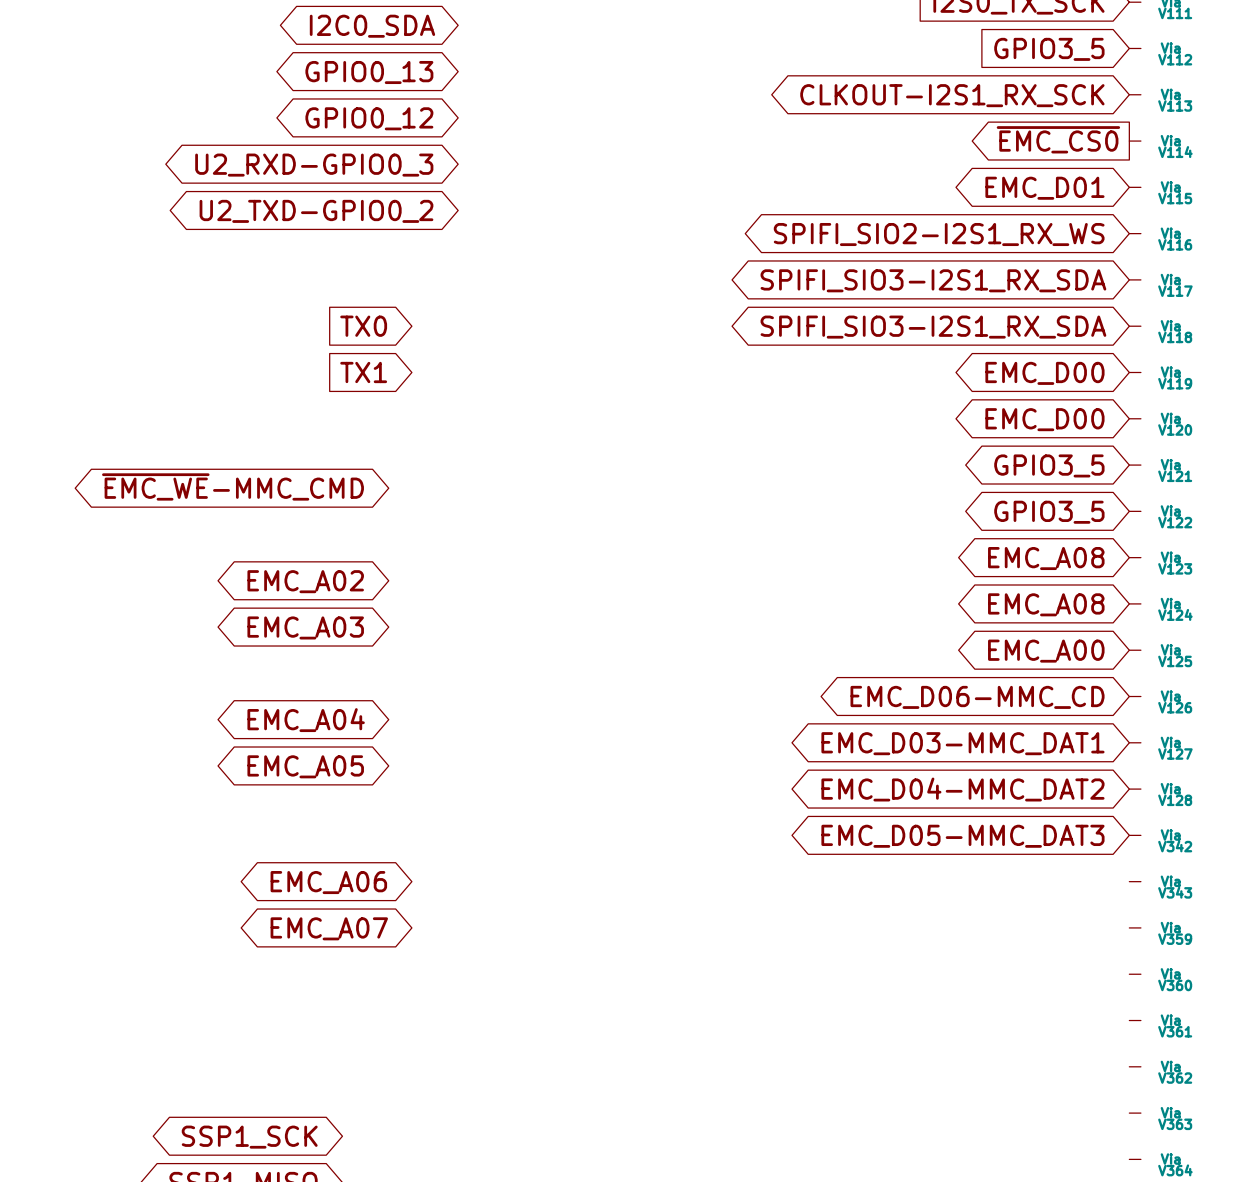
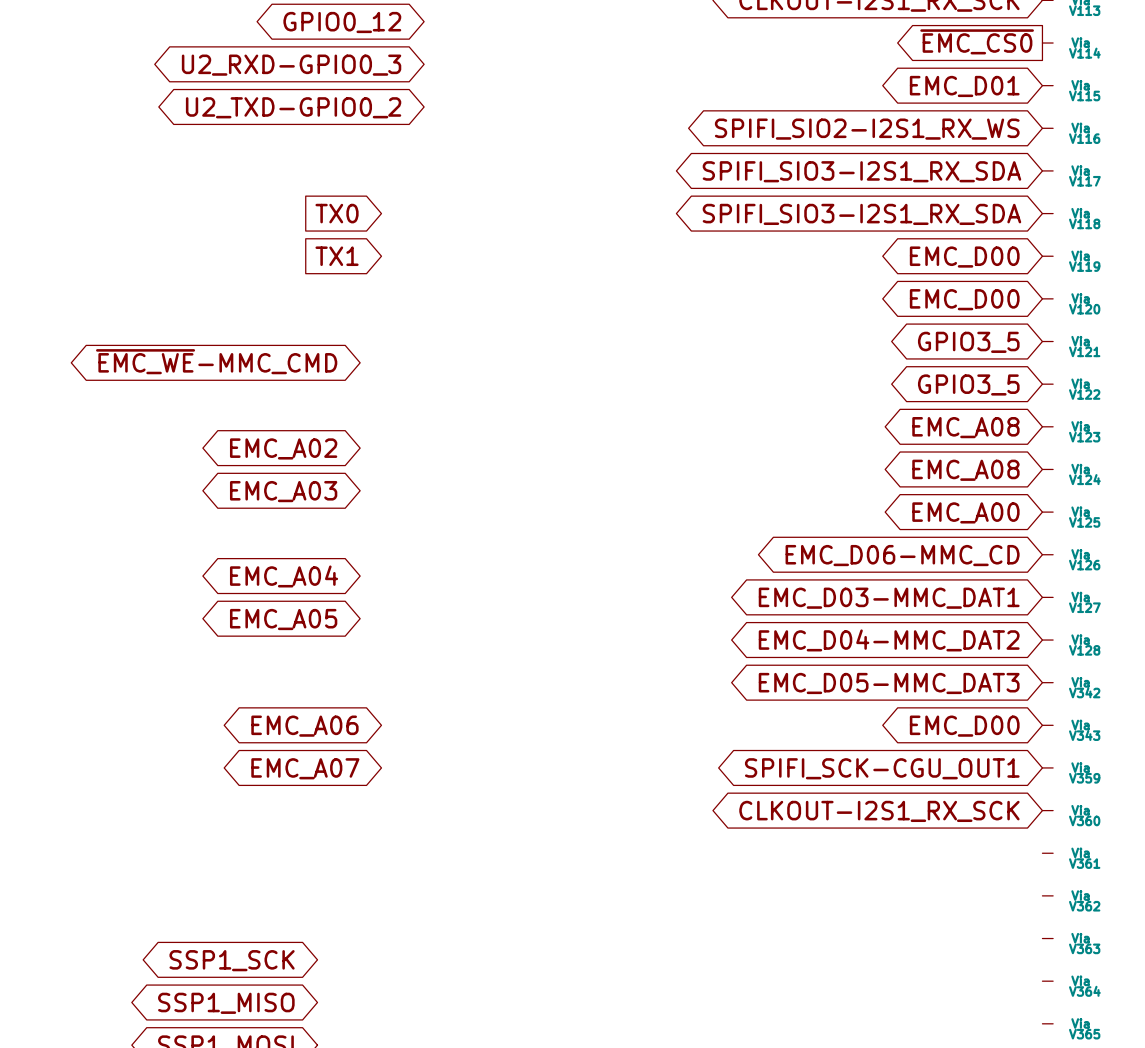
global label: none -> EMC_D00 (964, 726)
global label: none -> SPIFI_SCK-CGU_OUT1 (882, 768)
global label: none -> CLKOUT-I2S1_RX_SCK (879, 811)

